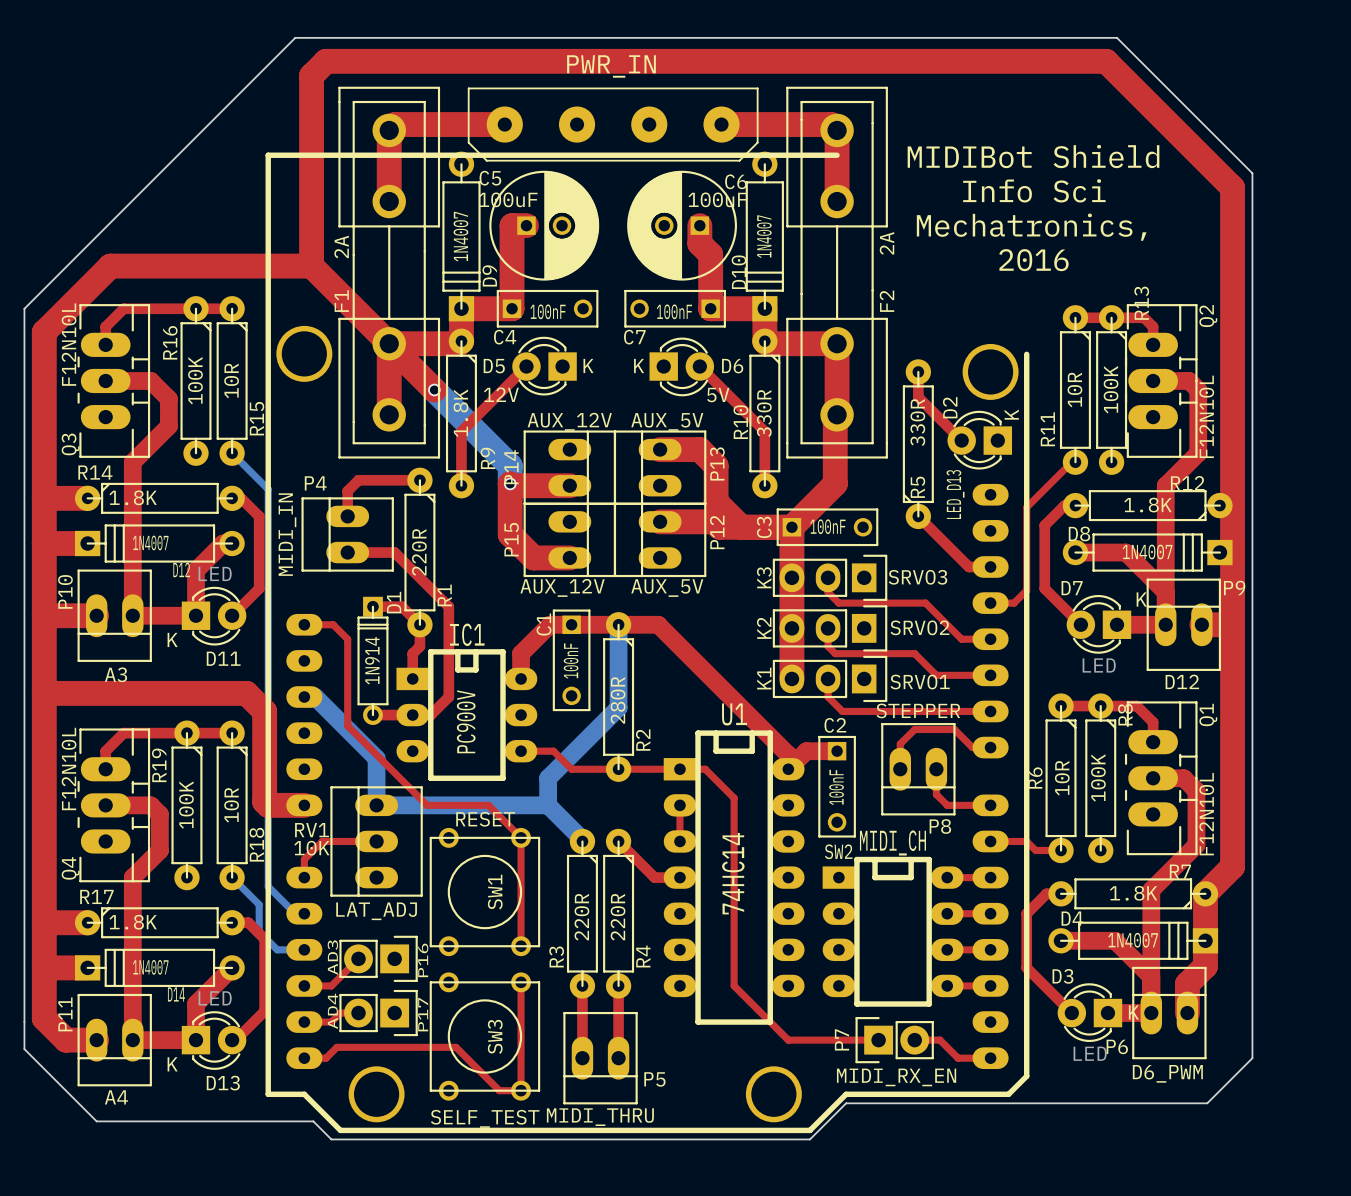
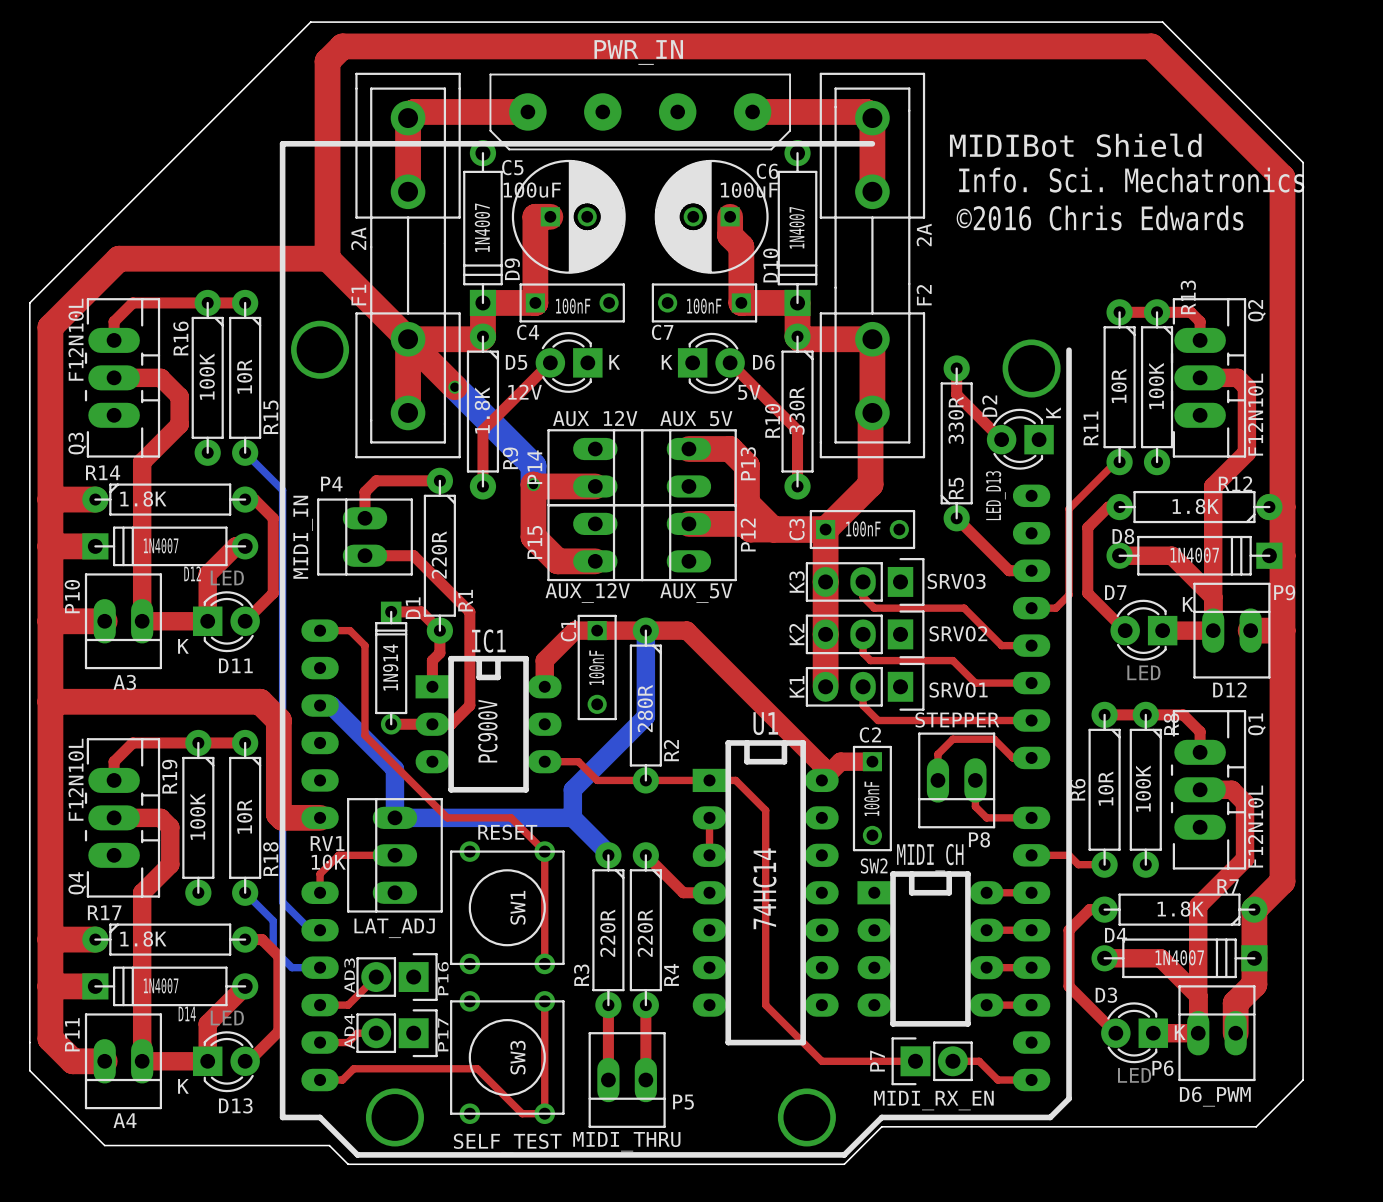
text: Info Sci (1034, 190) -> none
text: none -> ©2016 Chris Edwards (1100, 218)
text: Mechatronics, (1031, 227) -> Info. Sci. Mechatronics (1131, 180)
text: 2016 (1033, 260) -> none

